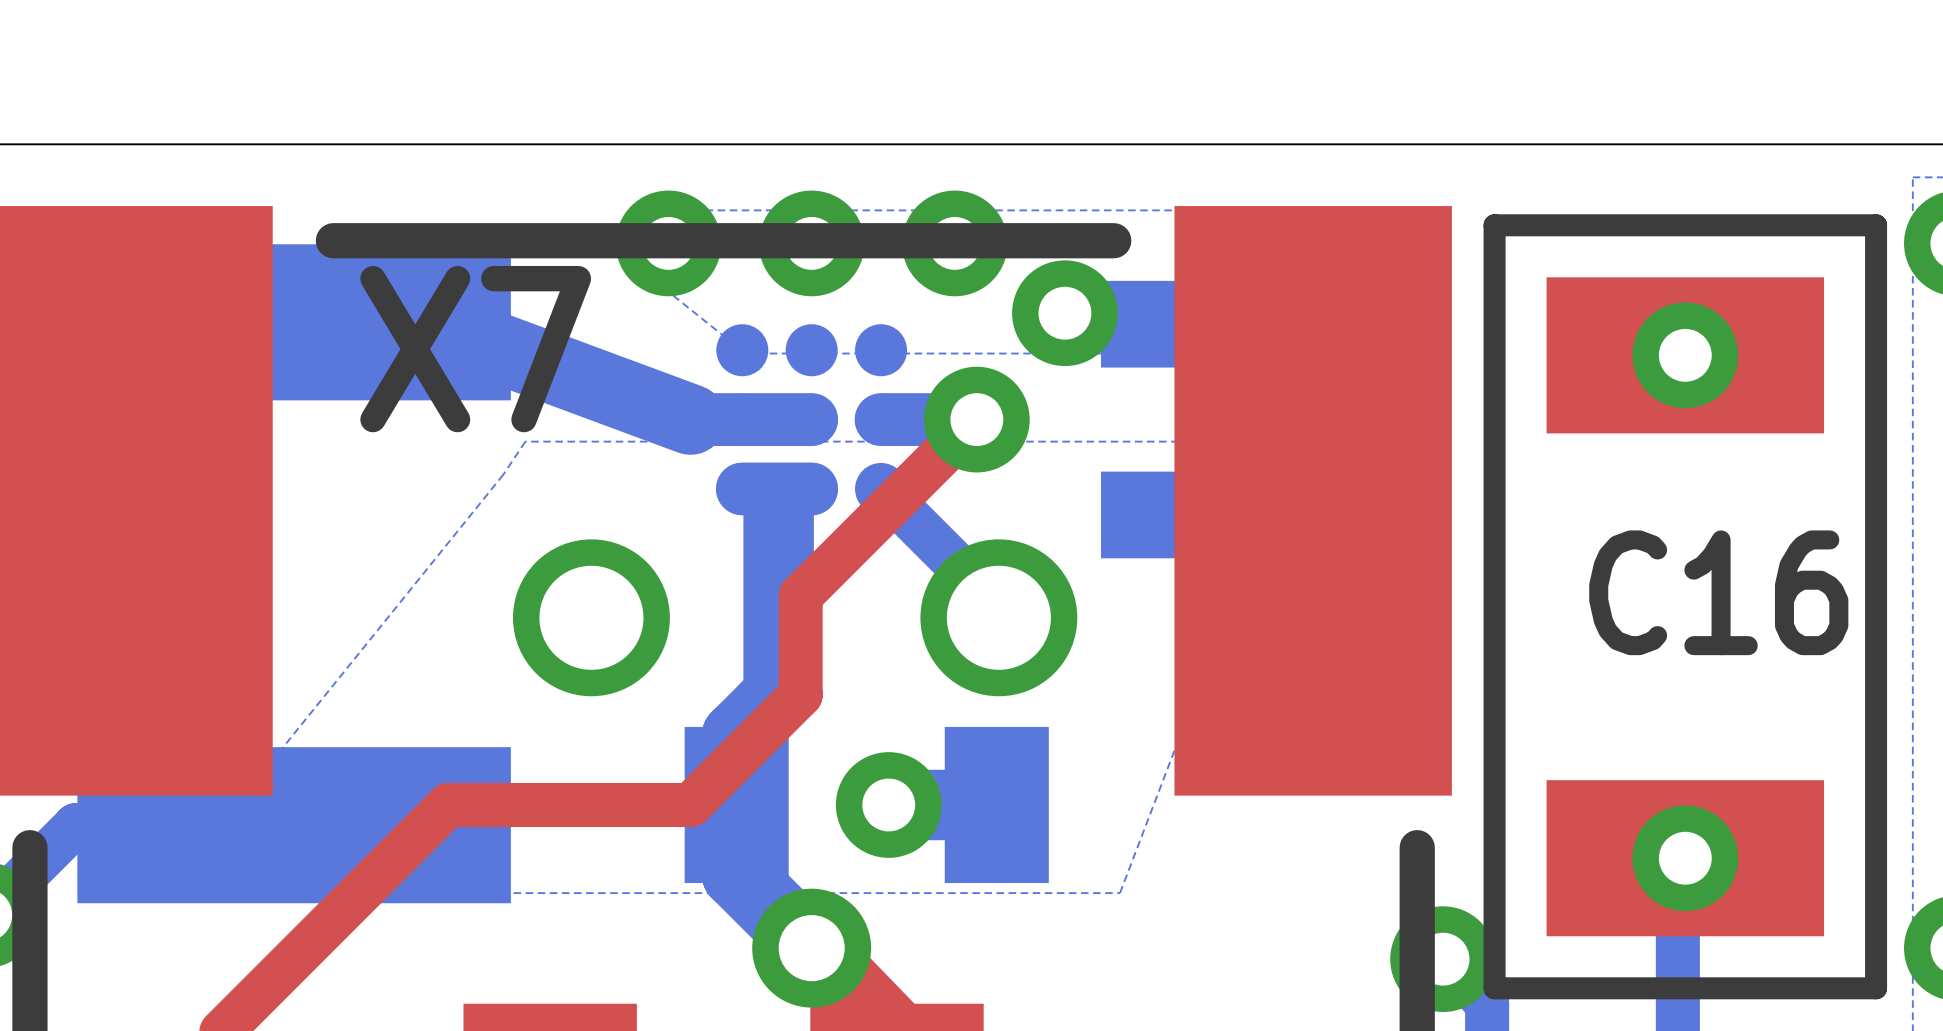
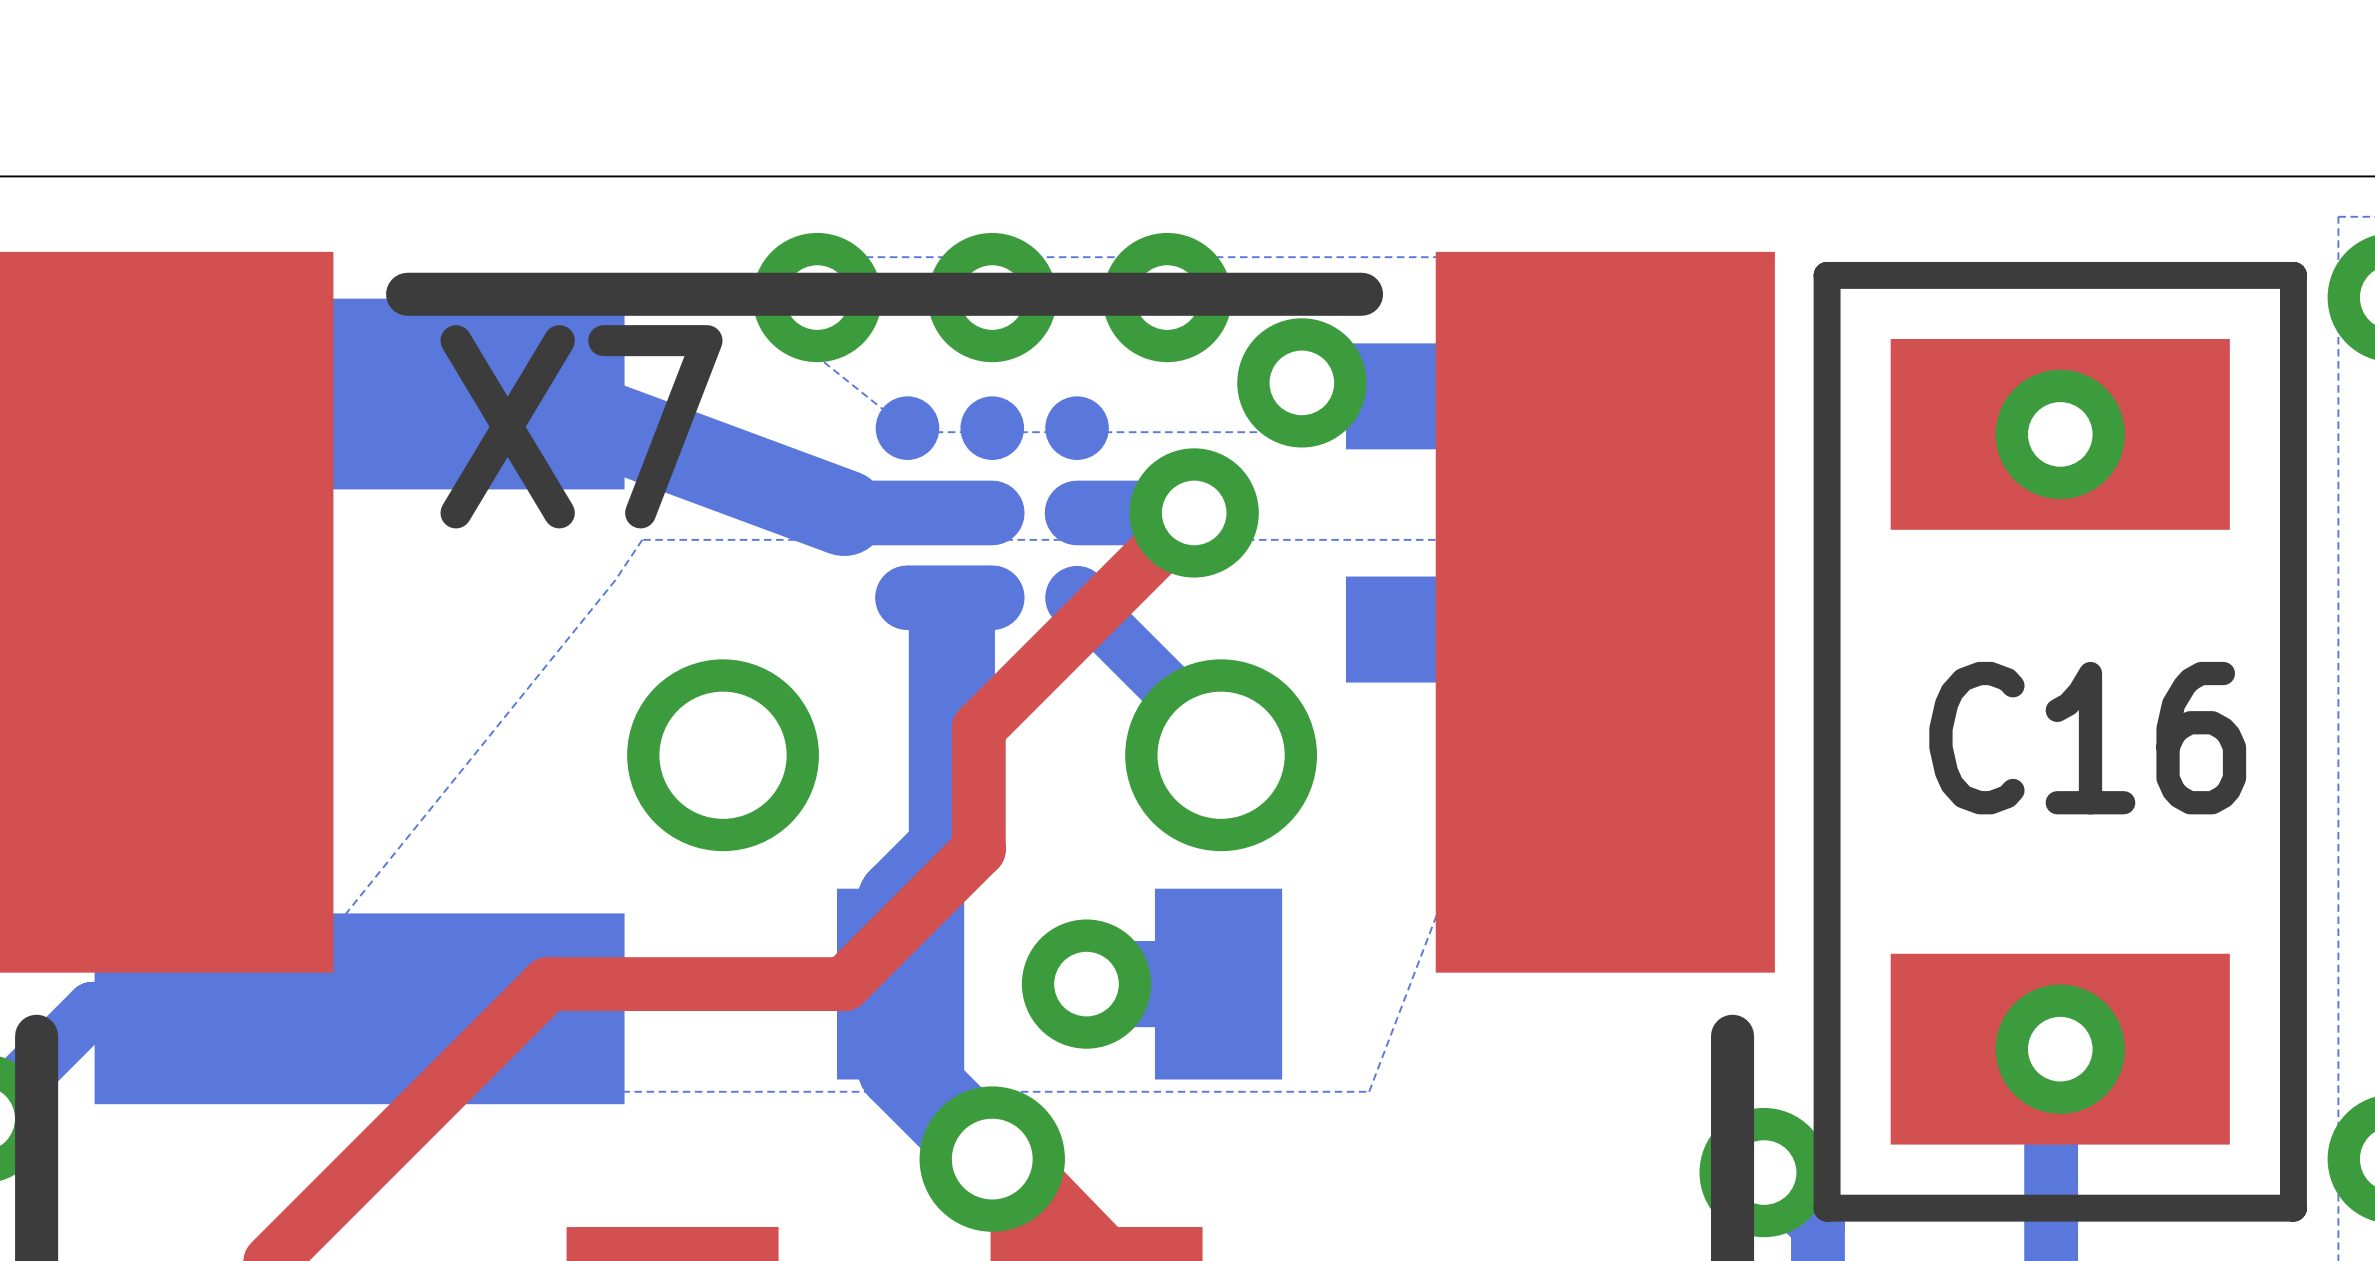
C16 name position: C16 (1718, 592) -> C16 (2087, 738)

